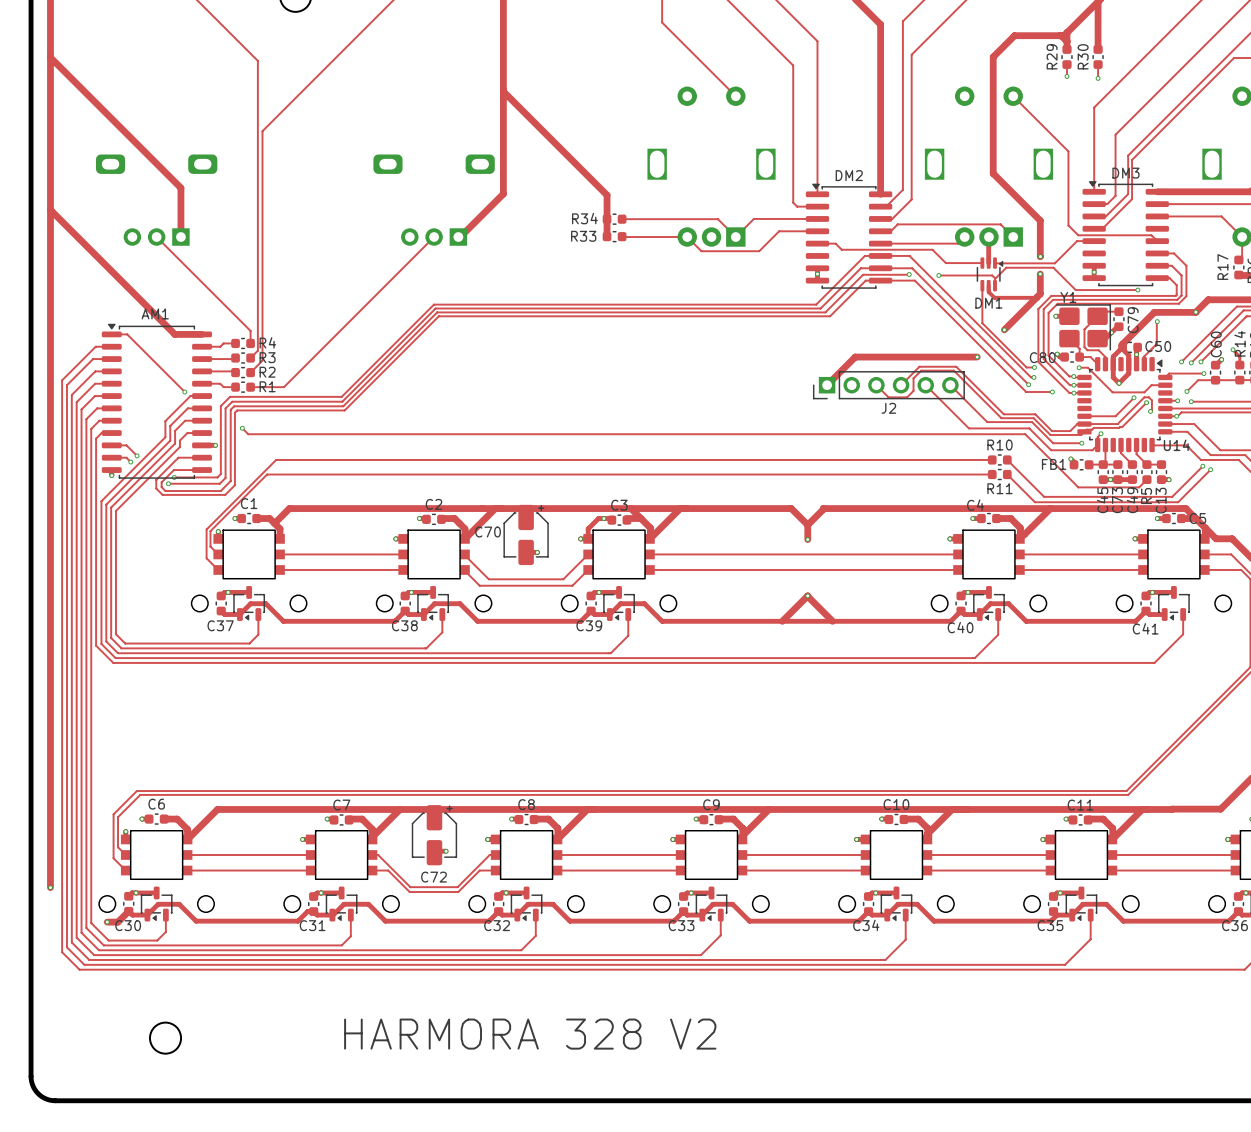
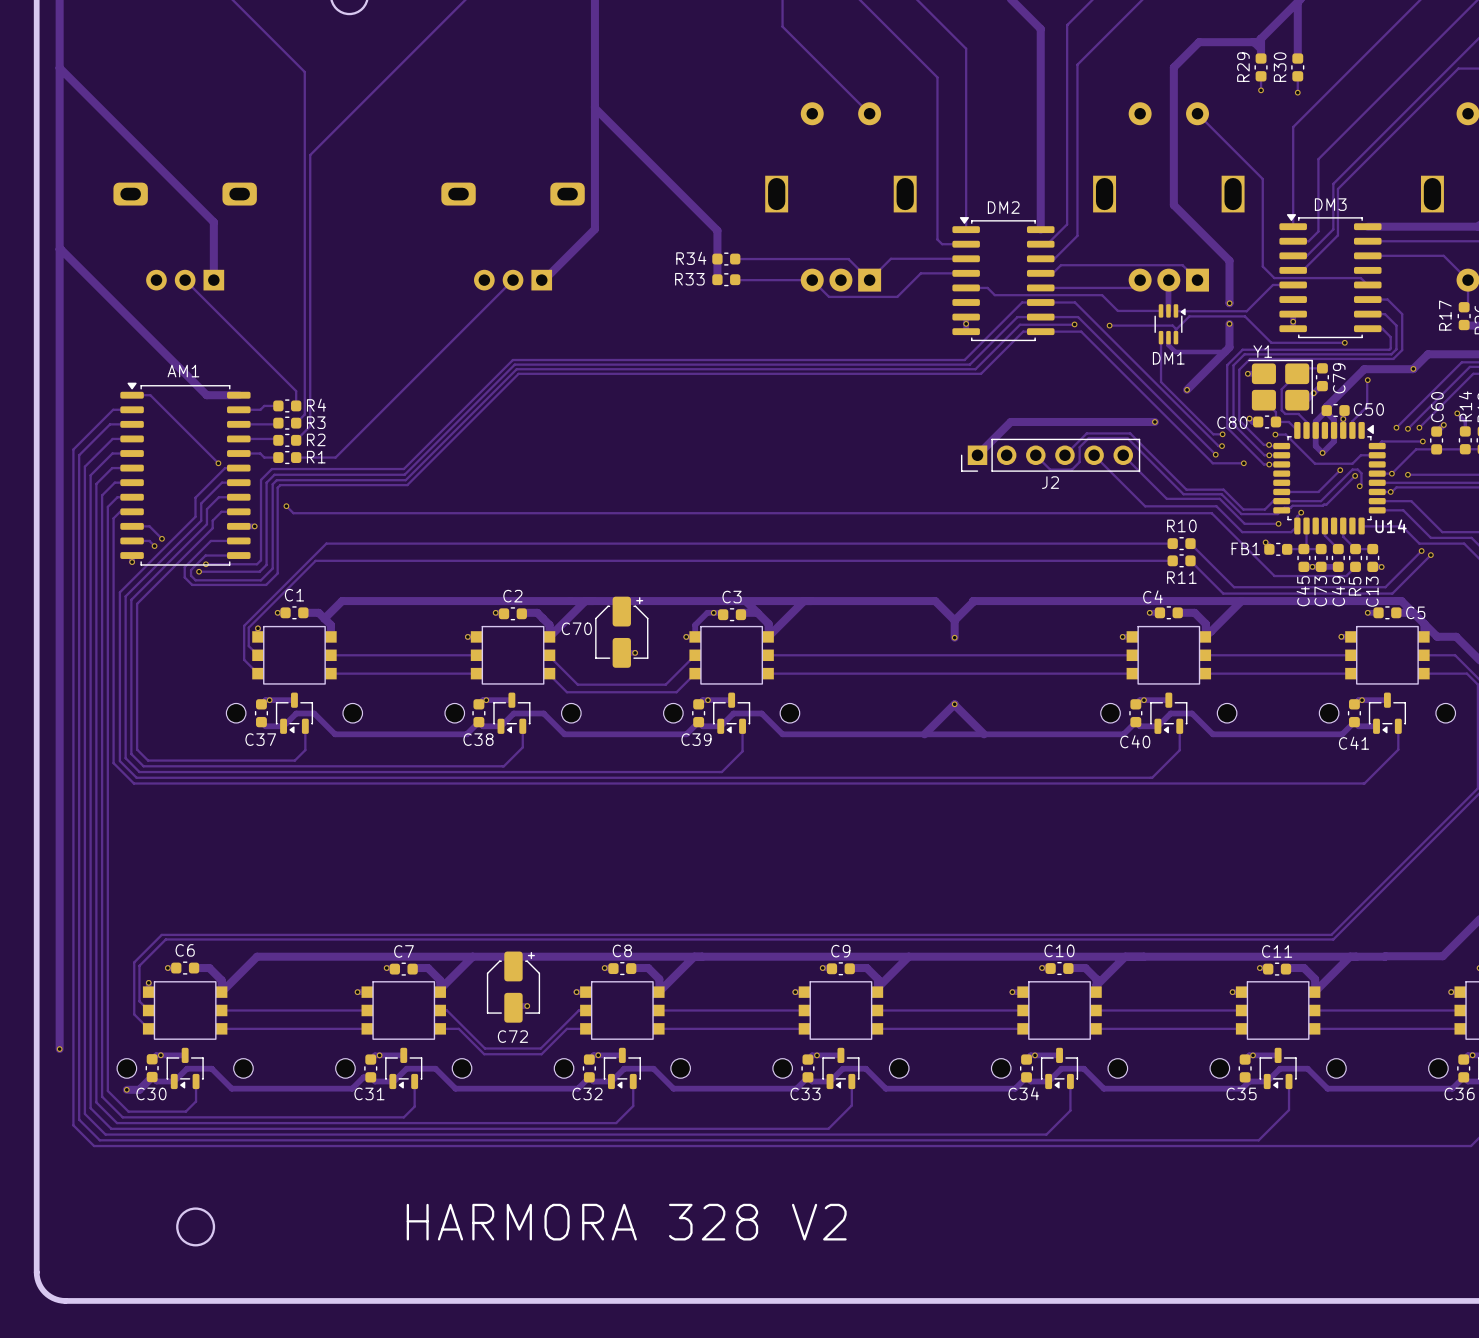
track: none -> (1402, 462) (1391, 473)
via: (1186, 391) -> none

